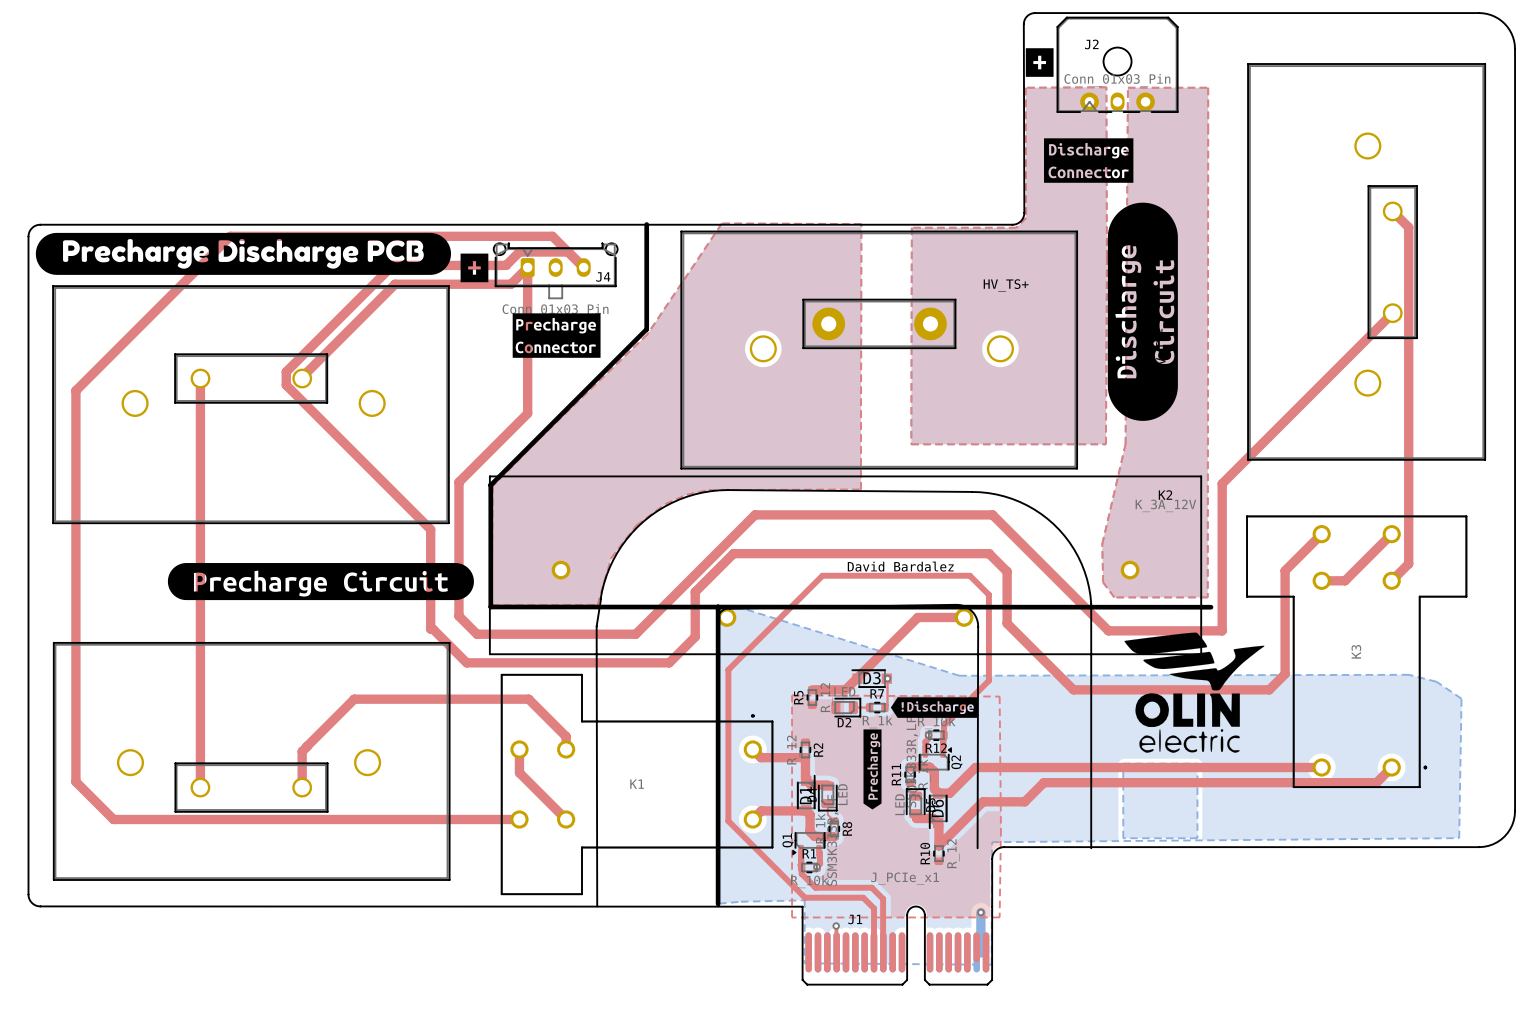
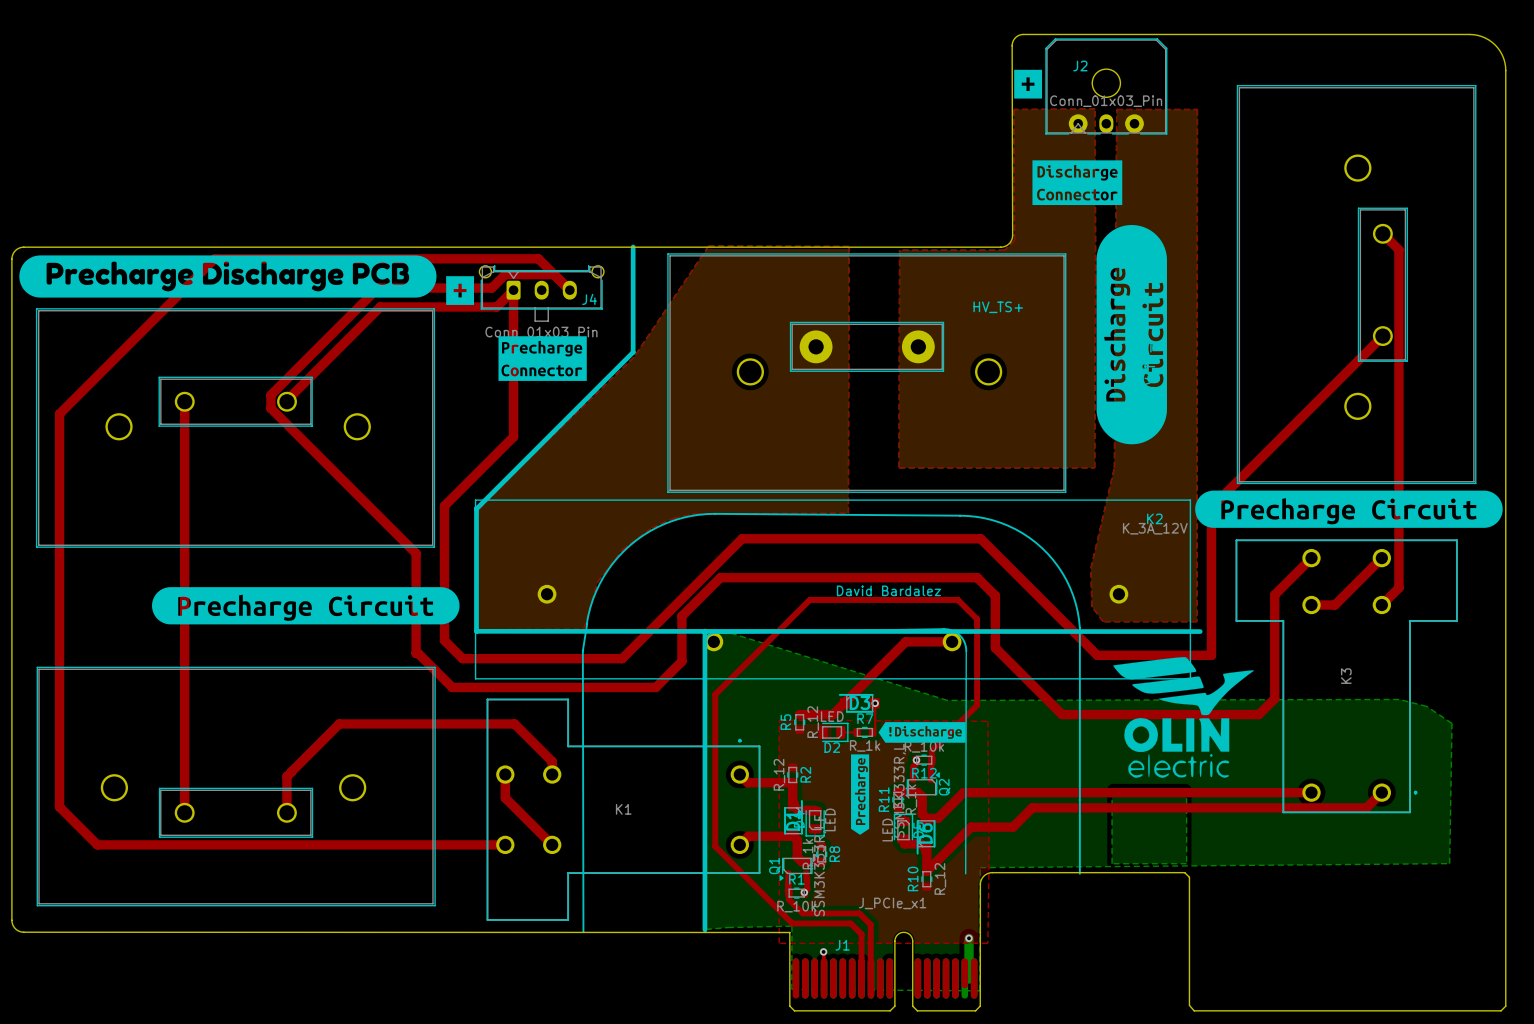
drawing: none -> [1195, 490, 1503, 528]
board edge: (1515, 811) (1512, 824) (1504, 836) (1497, 842) (1483, 846) (1195, 847) -> (1505, 836) (1505, 1006) (1501, 1010) (1194, 1010) (1189, 1005) (1189, 877) (1184, 872)

